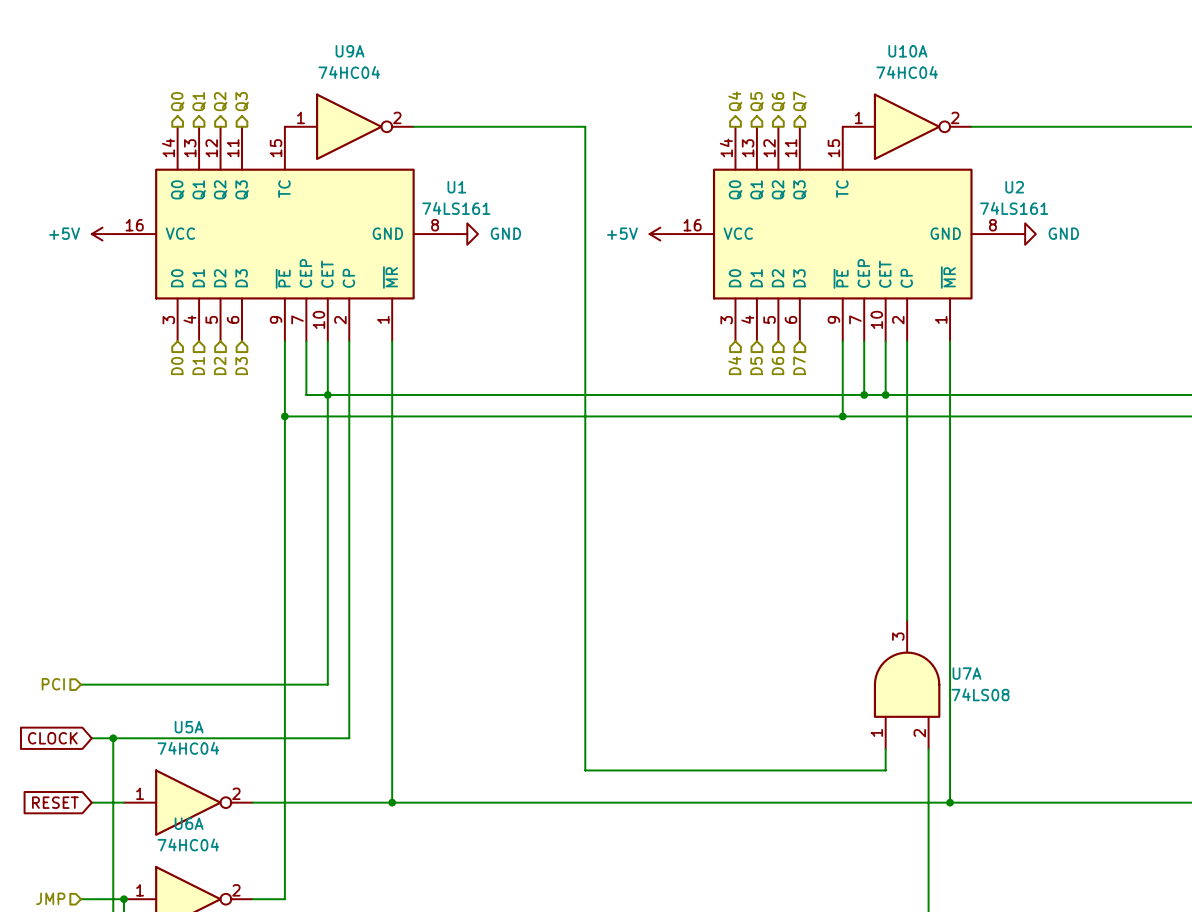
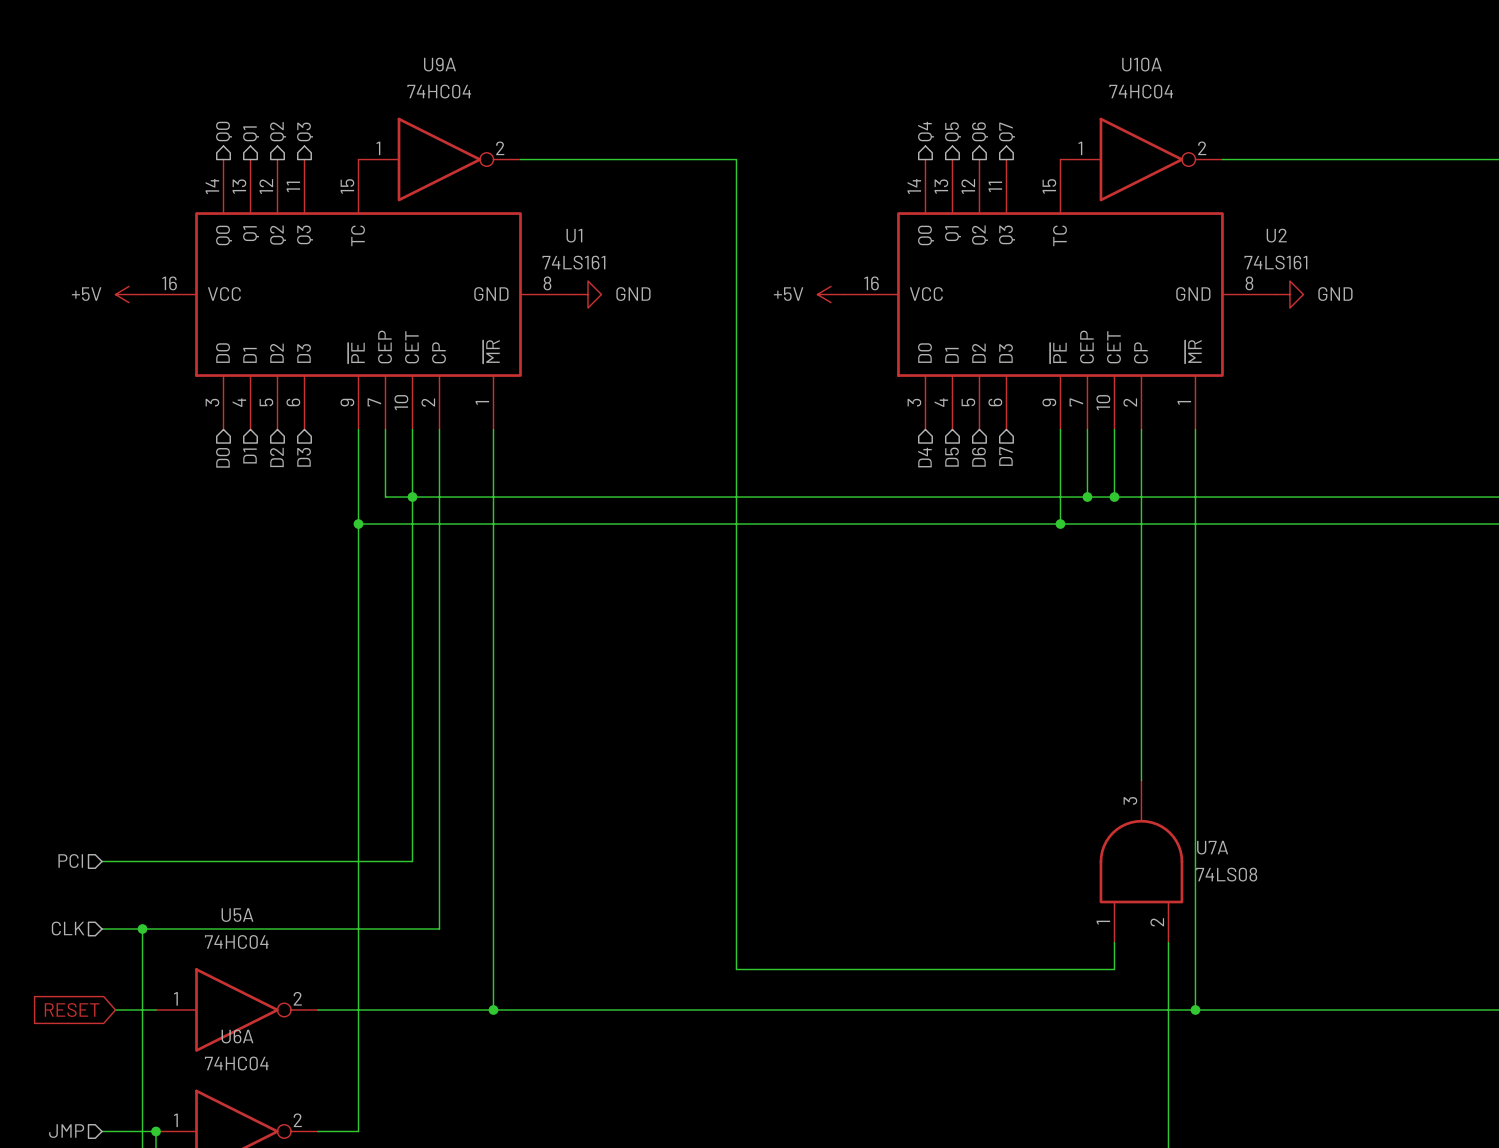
hierarchical label: none -> CLK (68, 928)
global label: CLOCK (52, 738) -> none
wire: none -> (102, 929) (115, 929)

